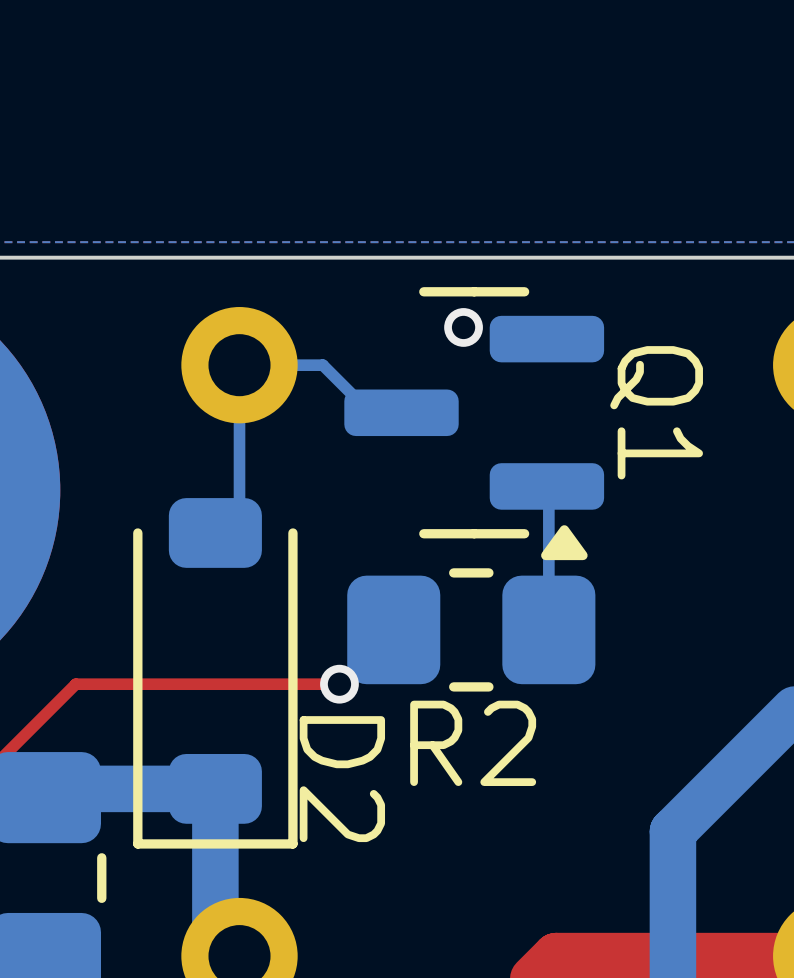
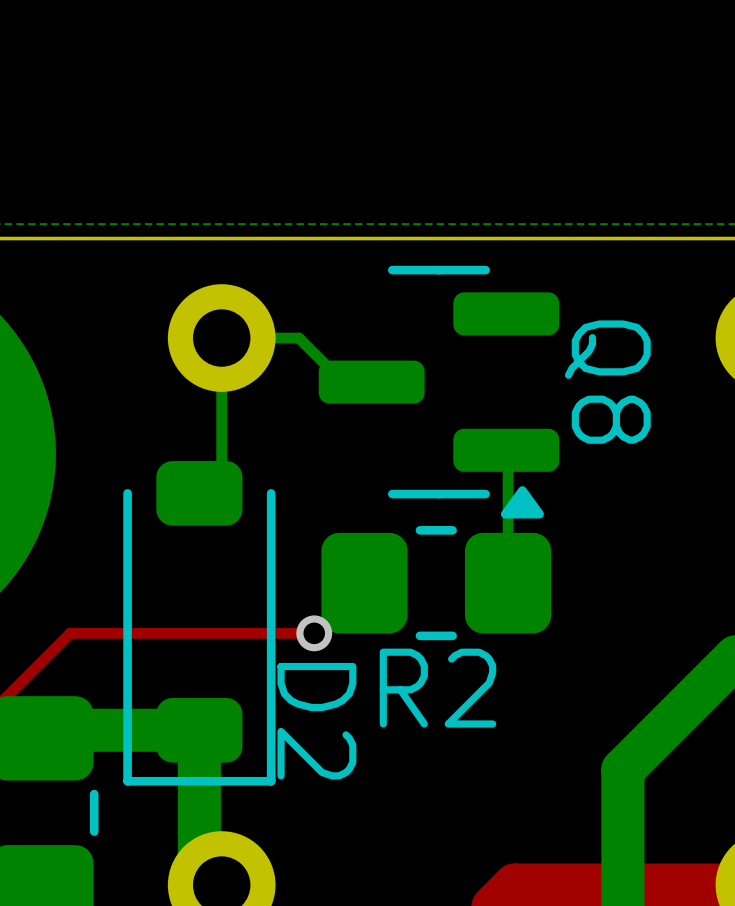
via: (463, 327) -> none
Q1 name: Q1 (656, 412) -> Q8 (607, 382)

